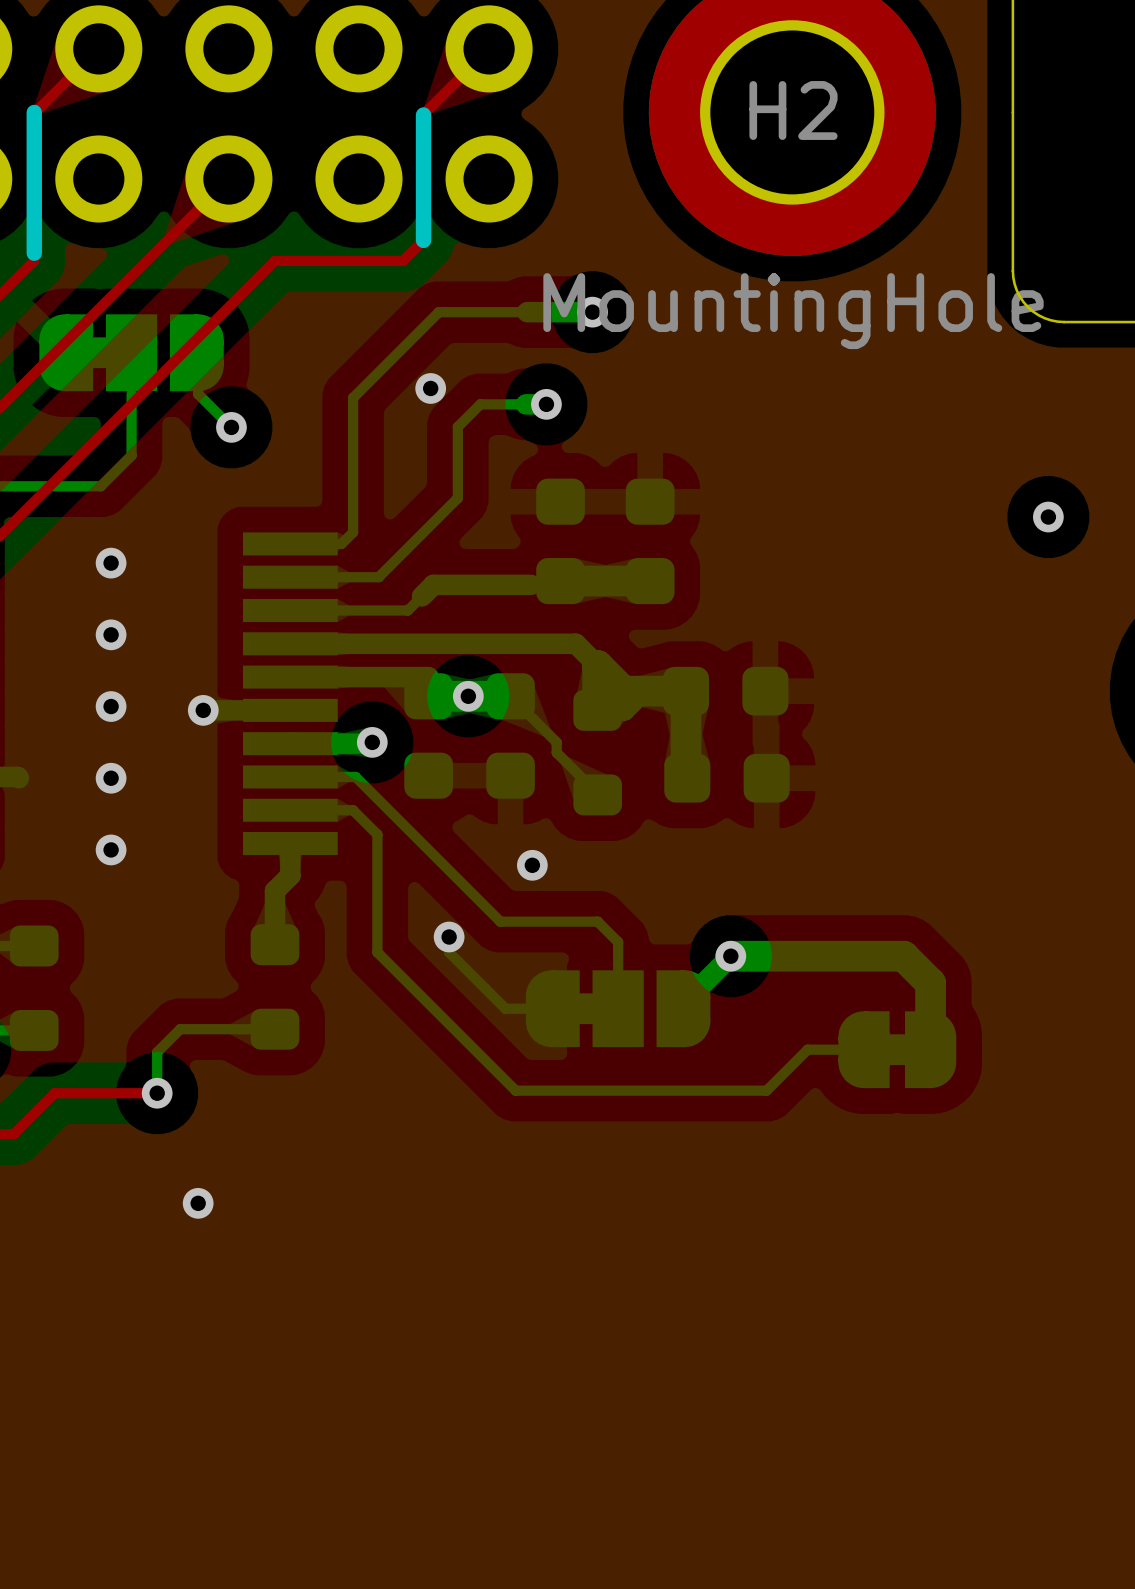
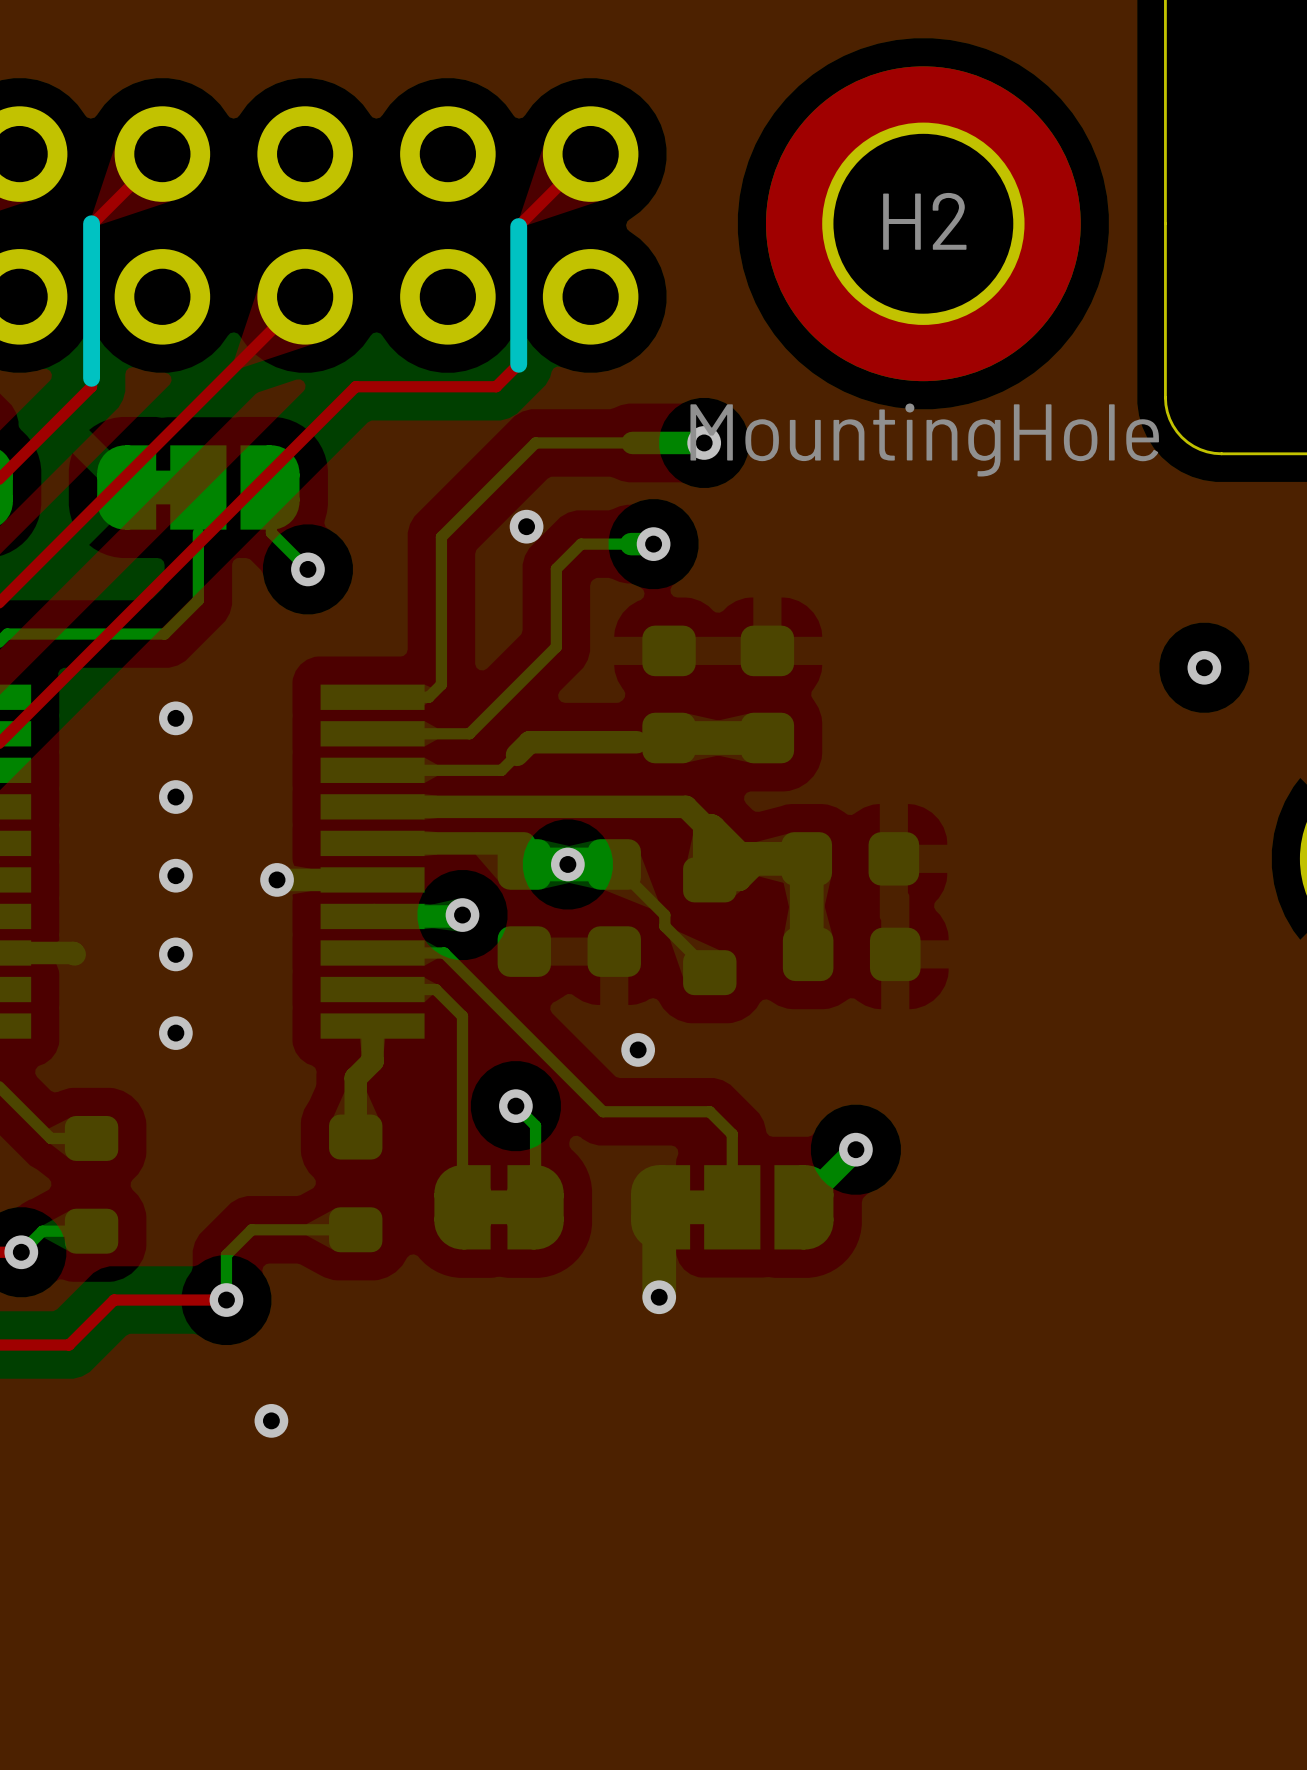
bottom track: (347, 810) (353, 810) (377, 834) (377, 952) (515, 1090) (766, 1090) (807, 1049) (863, 1049) -> (435, 989) (462, 1016) (462, 1207)
bottom track: none -> (515, 1106) (535, 1125) (535, 1207)
via position: (449, 937) -> (515, 1106)
bottom track: (730, 956) (903, 956) (930, 983) (930, 1049) -> none
part position: (897, 1049) -> (499, 1207)
via: none -> (659, 1297)

